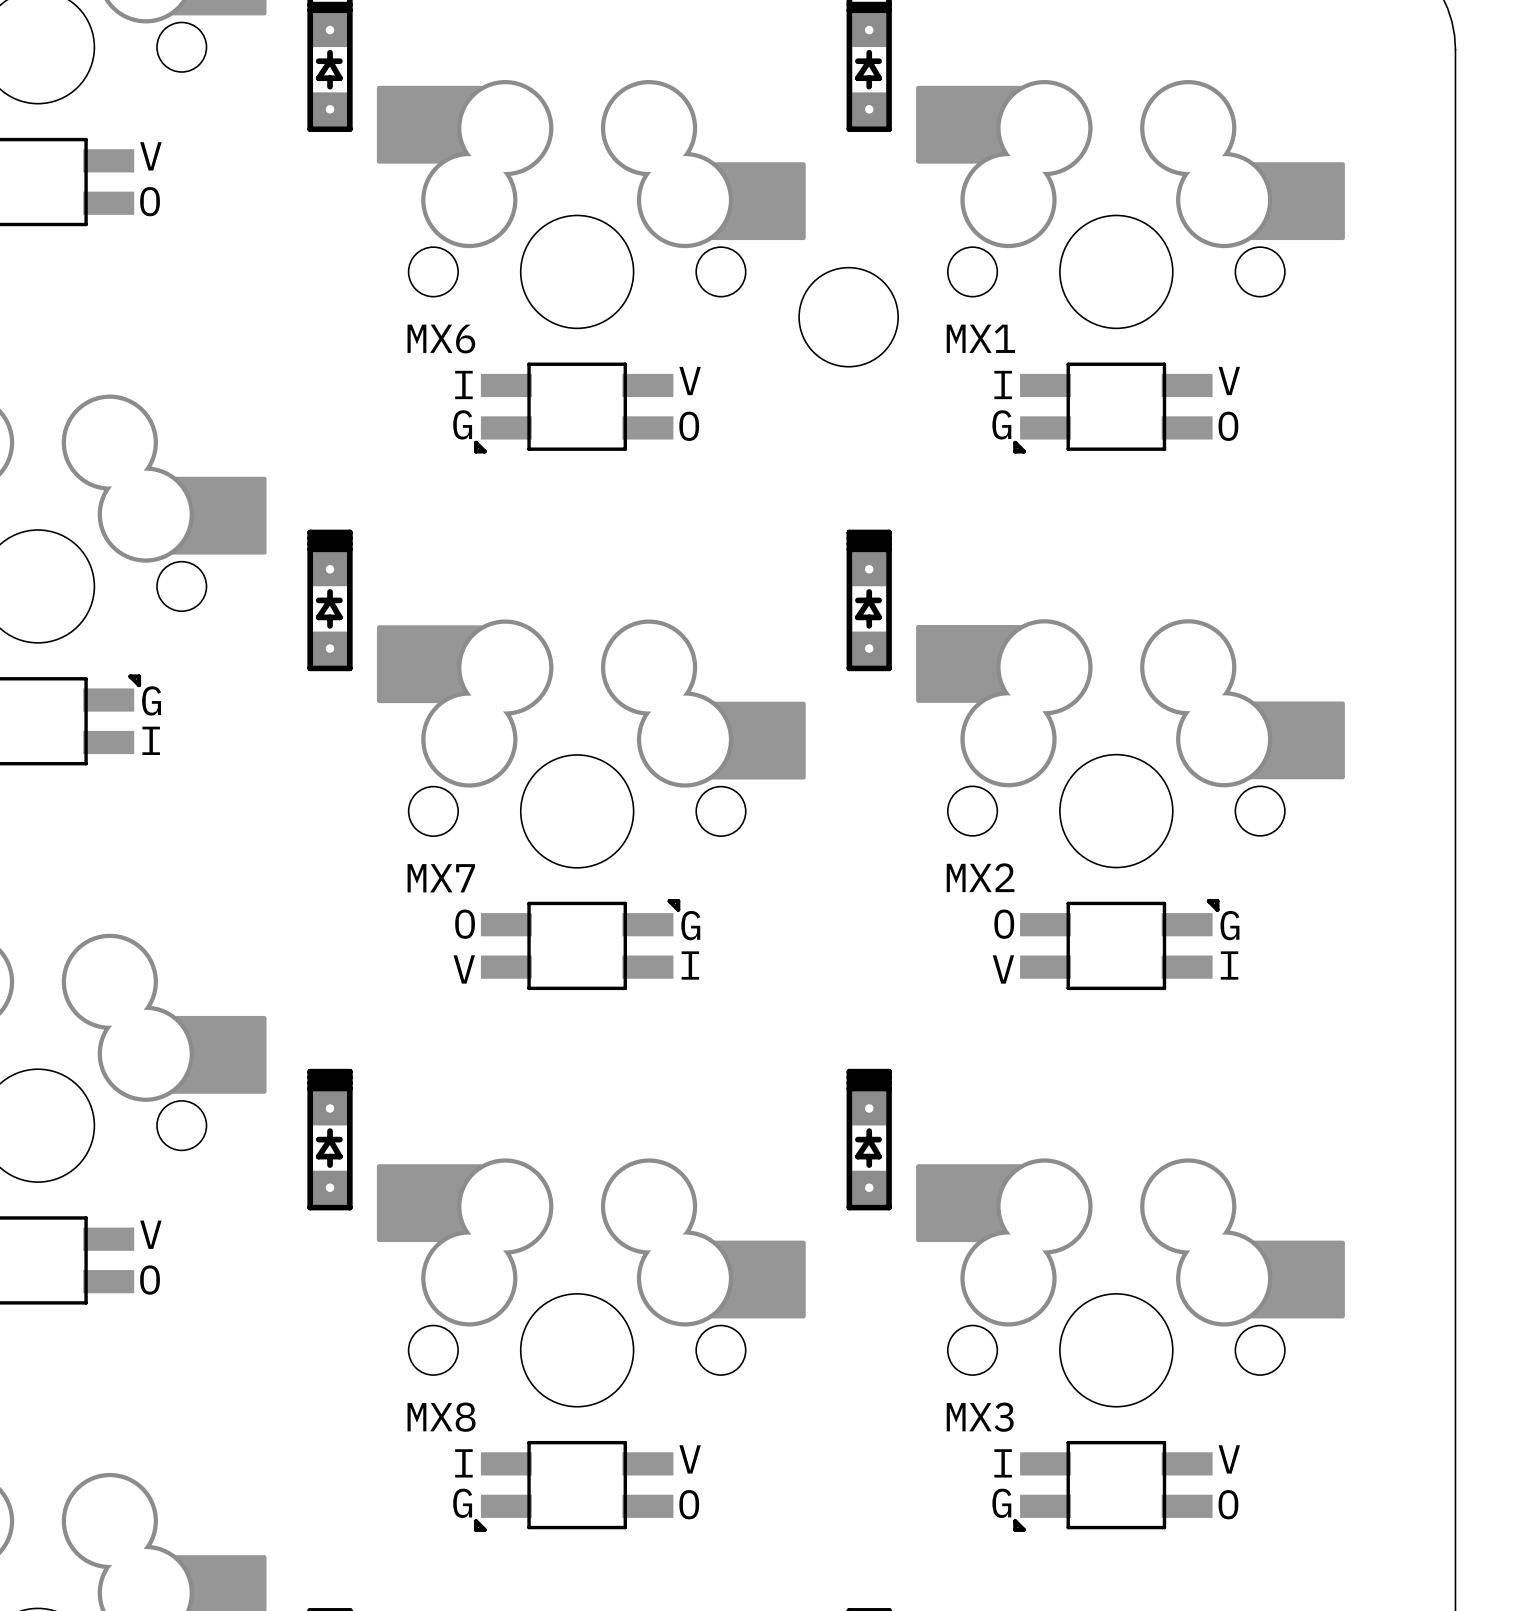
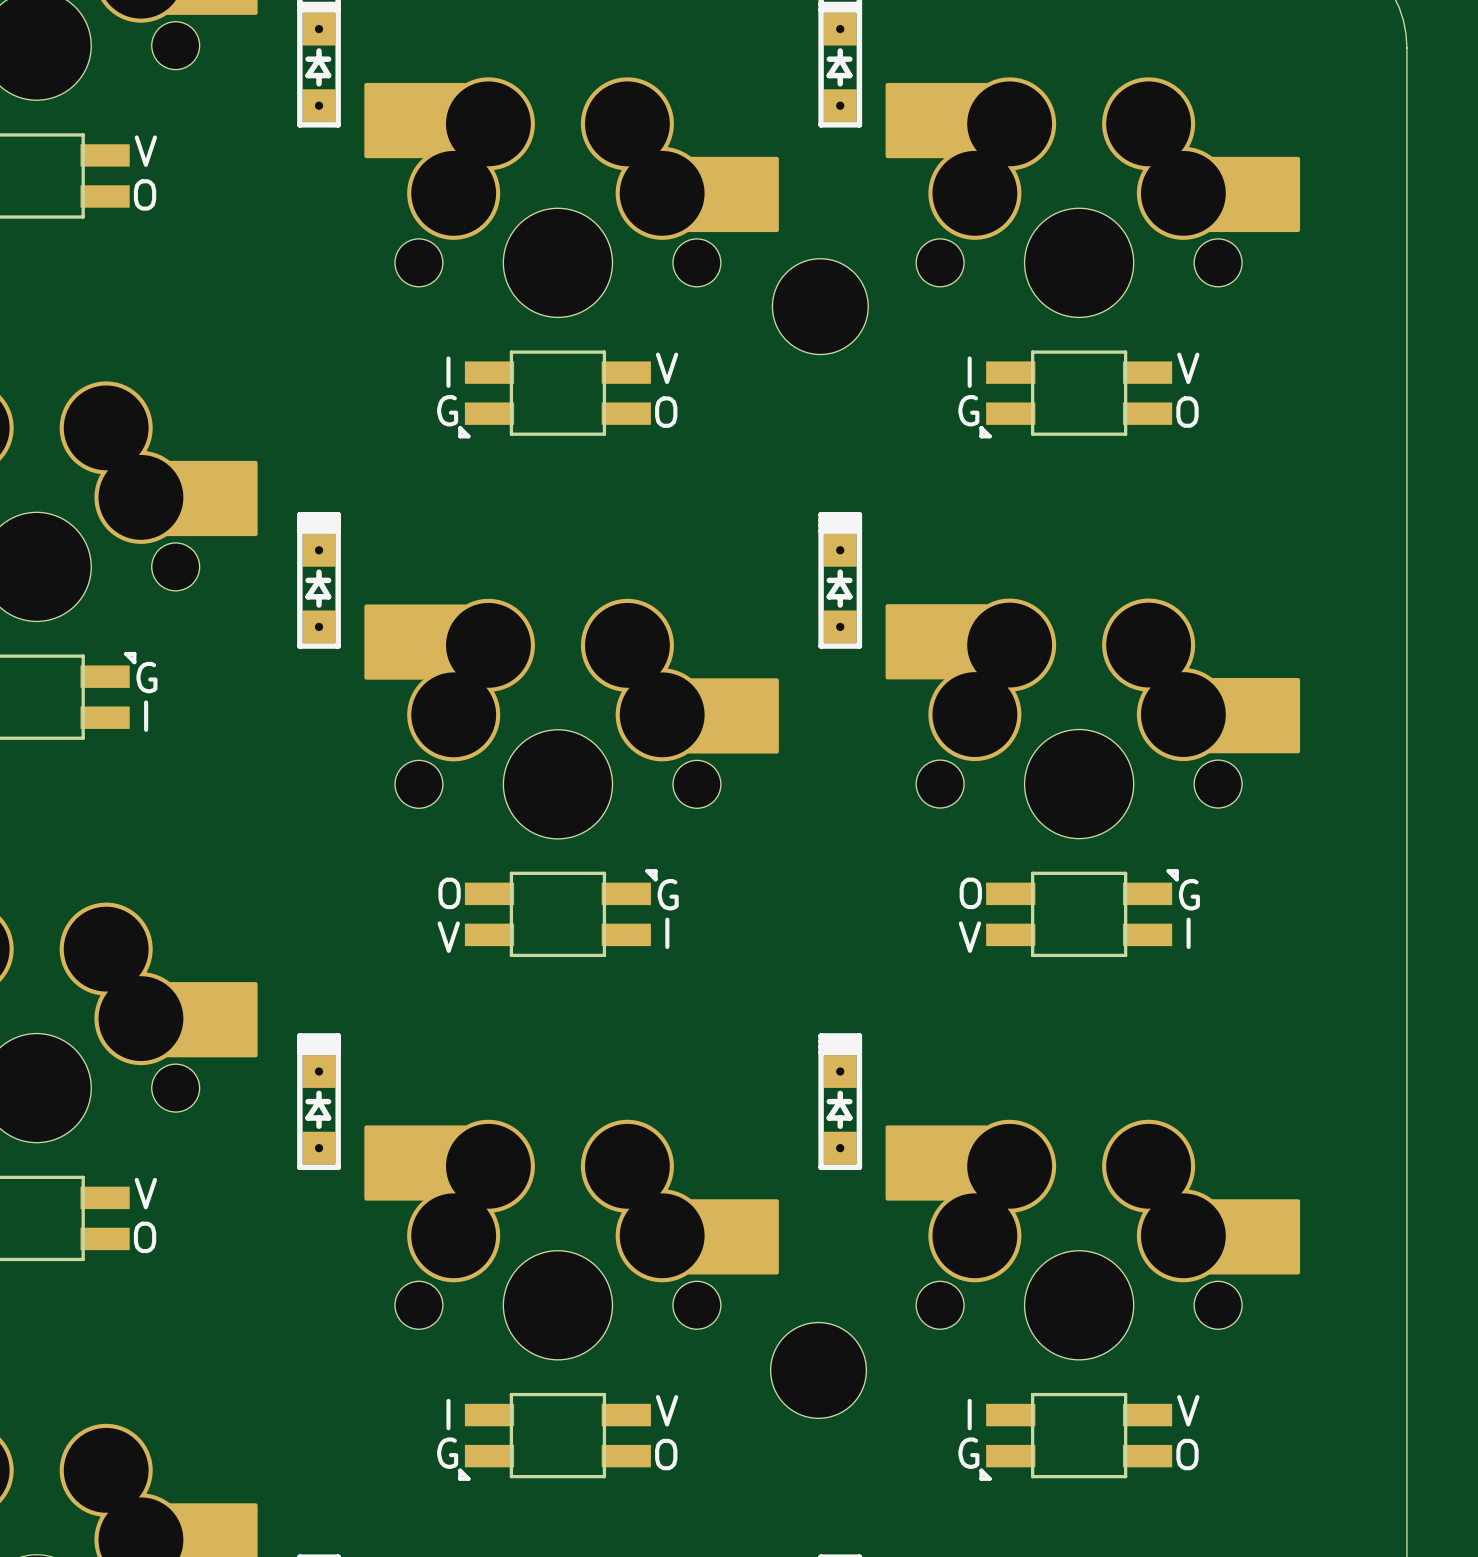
MX1 name: MX1 (980, 338) -> none
MX6 name: MX6 (441, 339) -> none
MX2 name: MX2 (980, 877) -> none
MX7 name: MX7 (441, 878) -> none
MX8 name: MX8 (441, 1417) -> none
part: none -> (818, 1370)
MX3 name: MX3 (980, 1417) -> none

